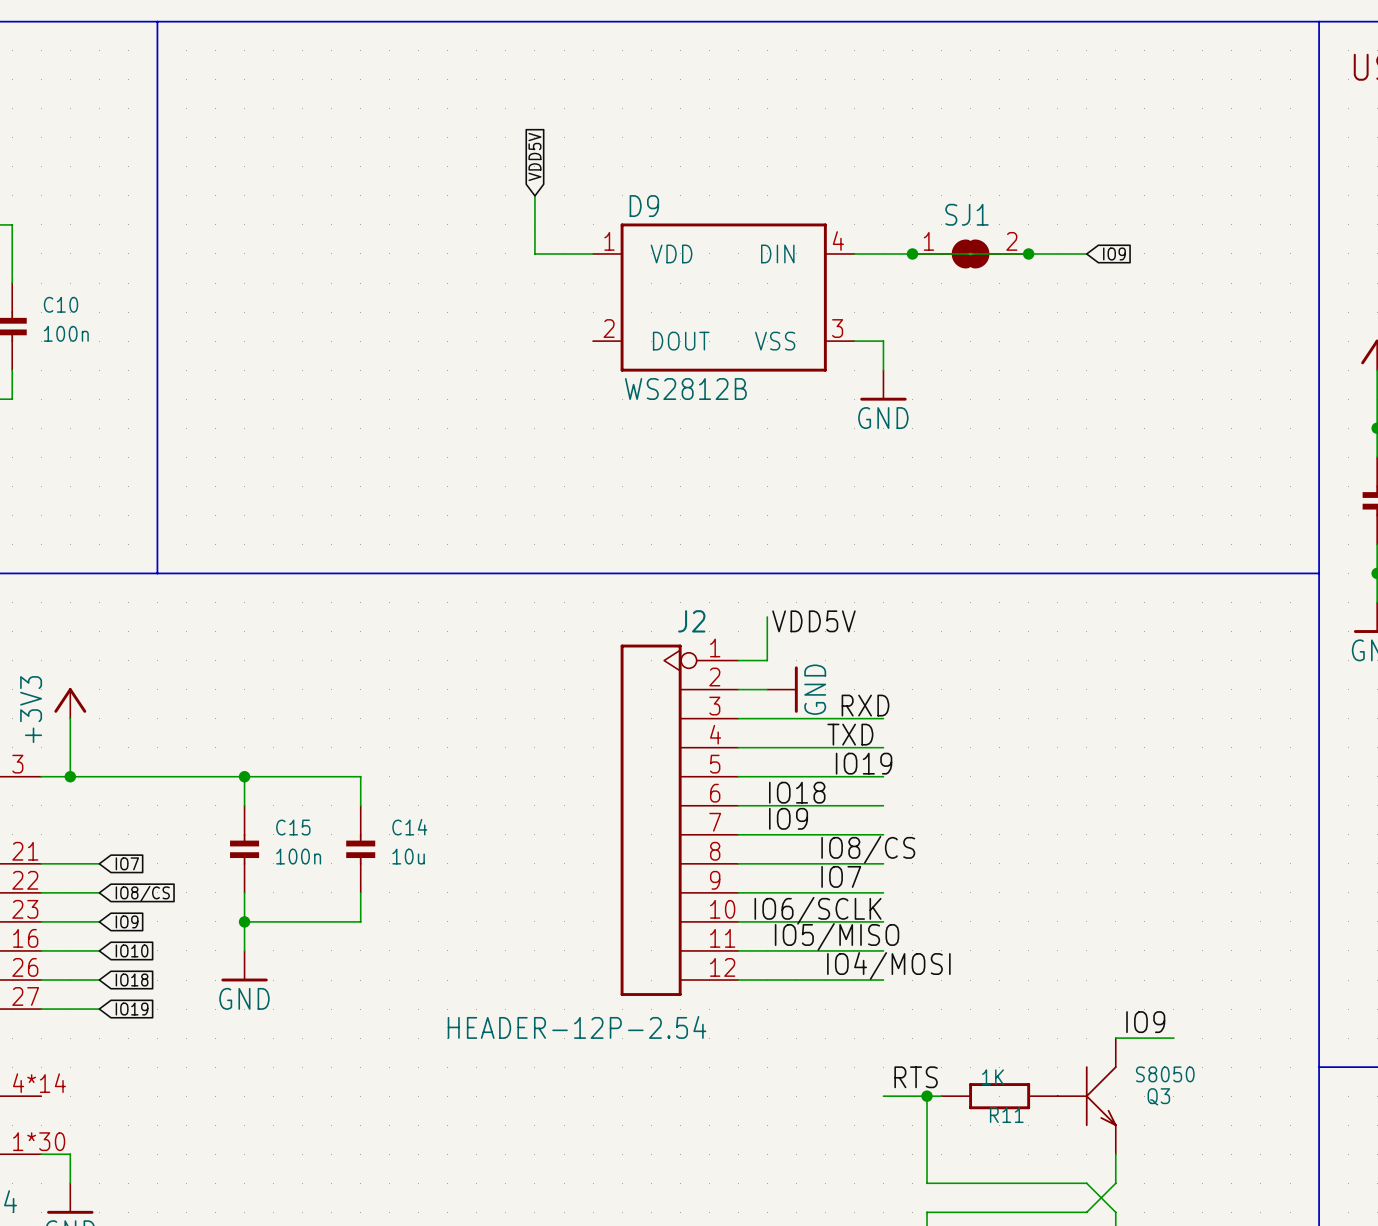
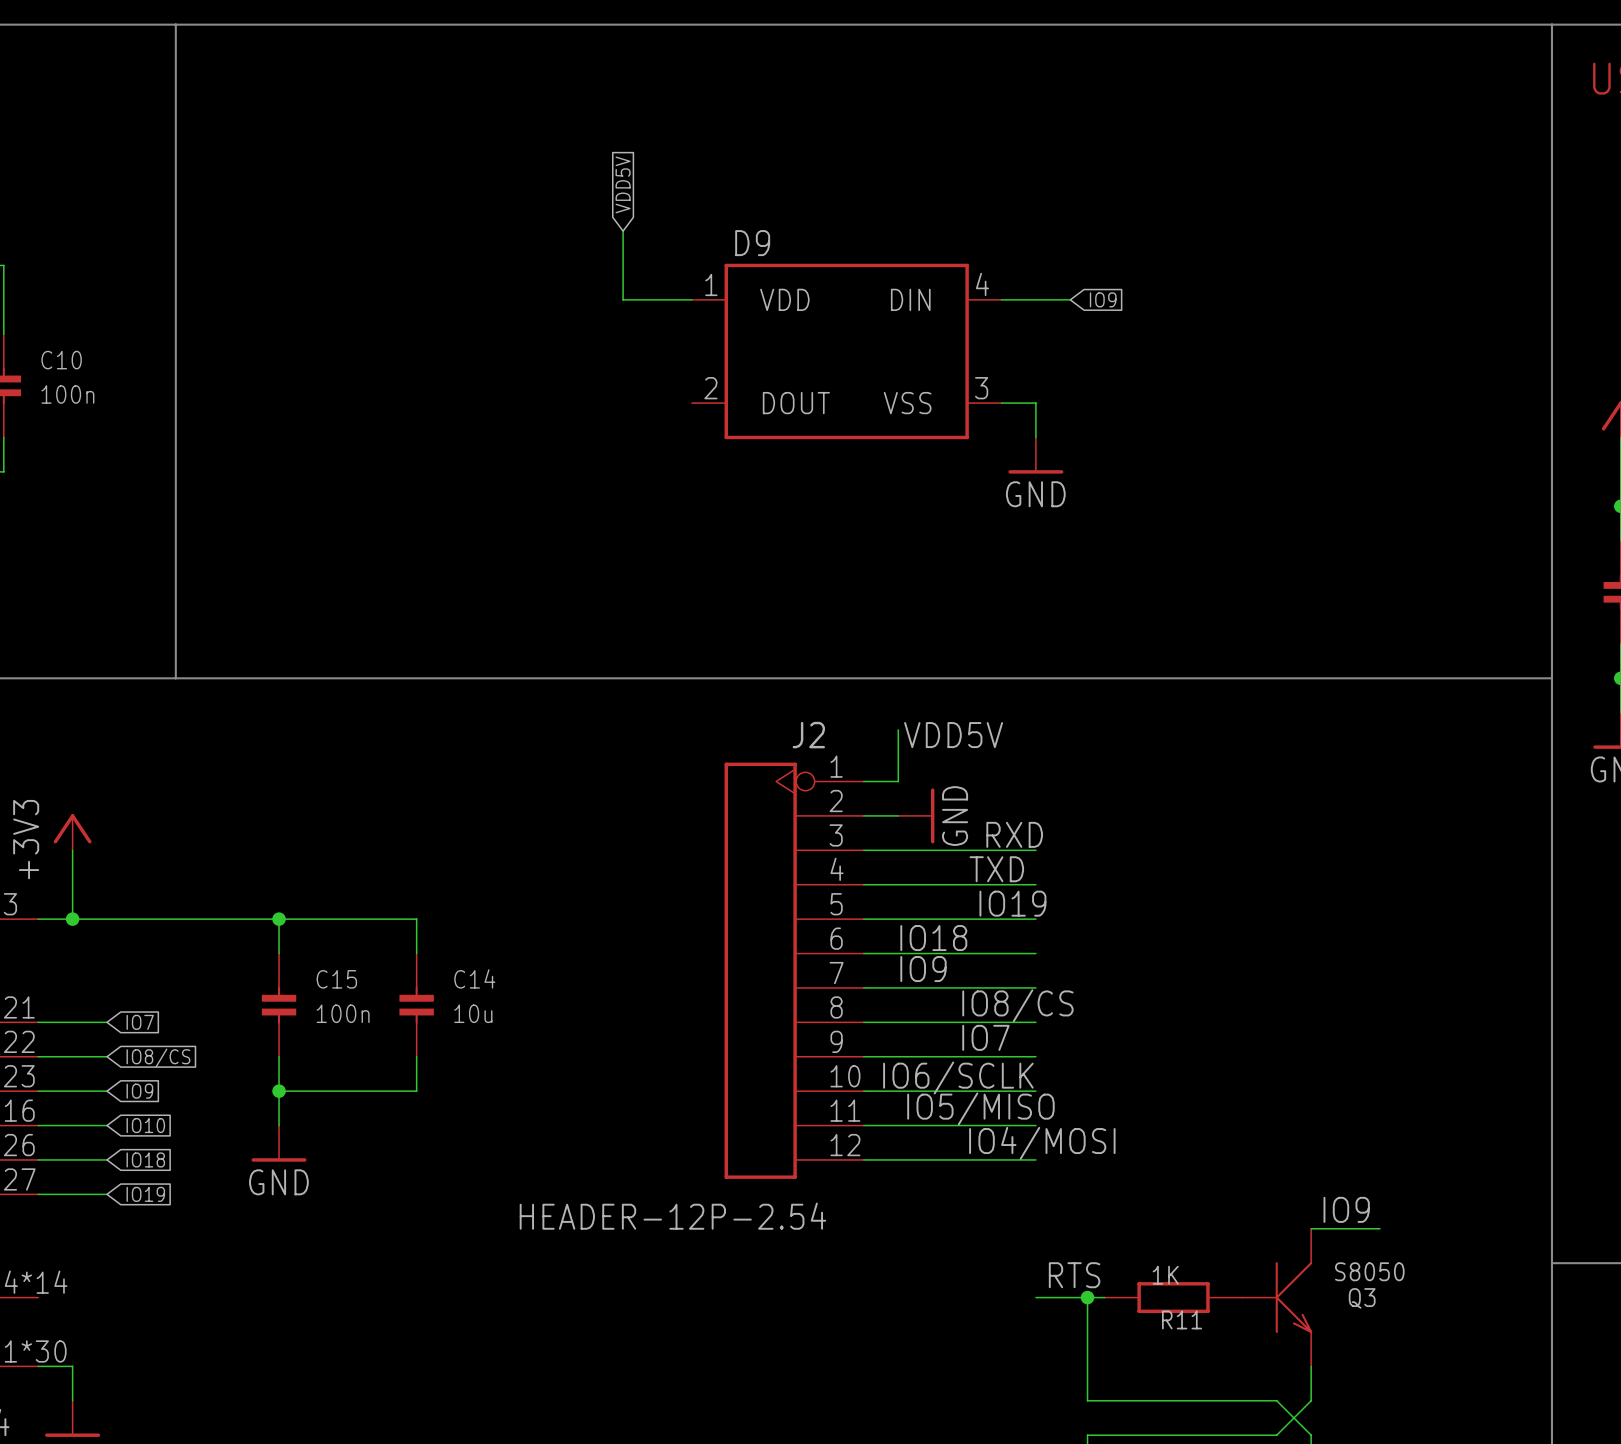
wire: (912, 253) (1086, 253) -> none
junction: (912, 253) -> none
SJ1: (970, 253) -> none
junction: (1028, 253) -> none
global label position: IO9 (1114, 253) -> IO9 (1103, 299)
D9 value: WS2812B (685, 389) -> none

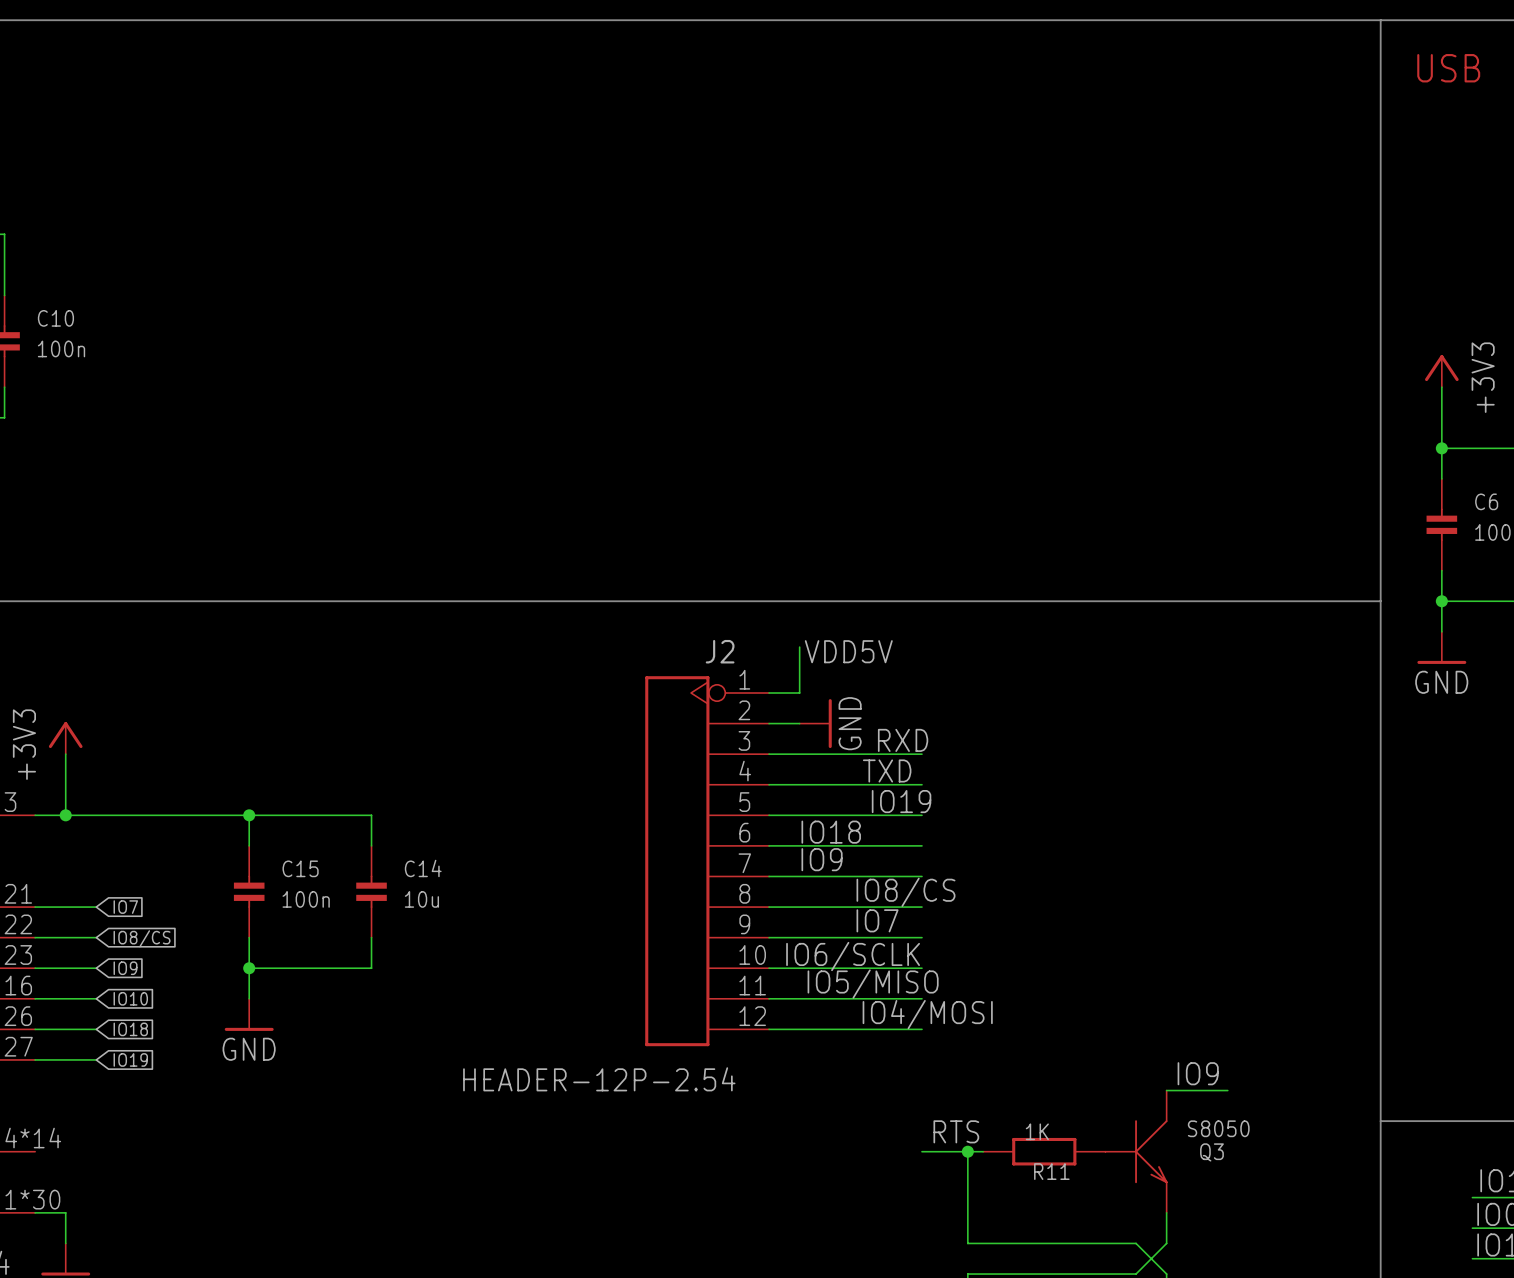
line: (175, 24) (175, 678) -> none
global label: VDD5V (623, 184) -> none
wire: (623, 231) (623, 299) (691, 299) -> none
wire: (1001, 299) (1070, 299) -> none
global label: IO9 (1103, 299) -> none
D9: (846, 351) -> none
wire: (1001, 403) (1035, 403) (1035, 437) -> none
power symbol: GND (1035, 455) -> none

